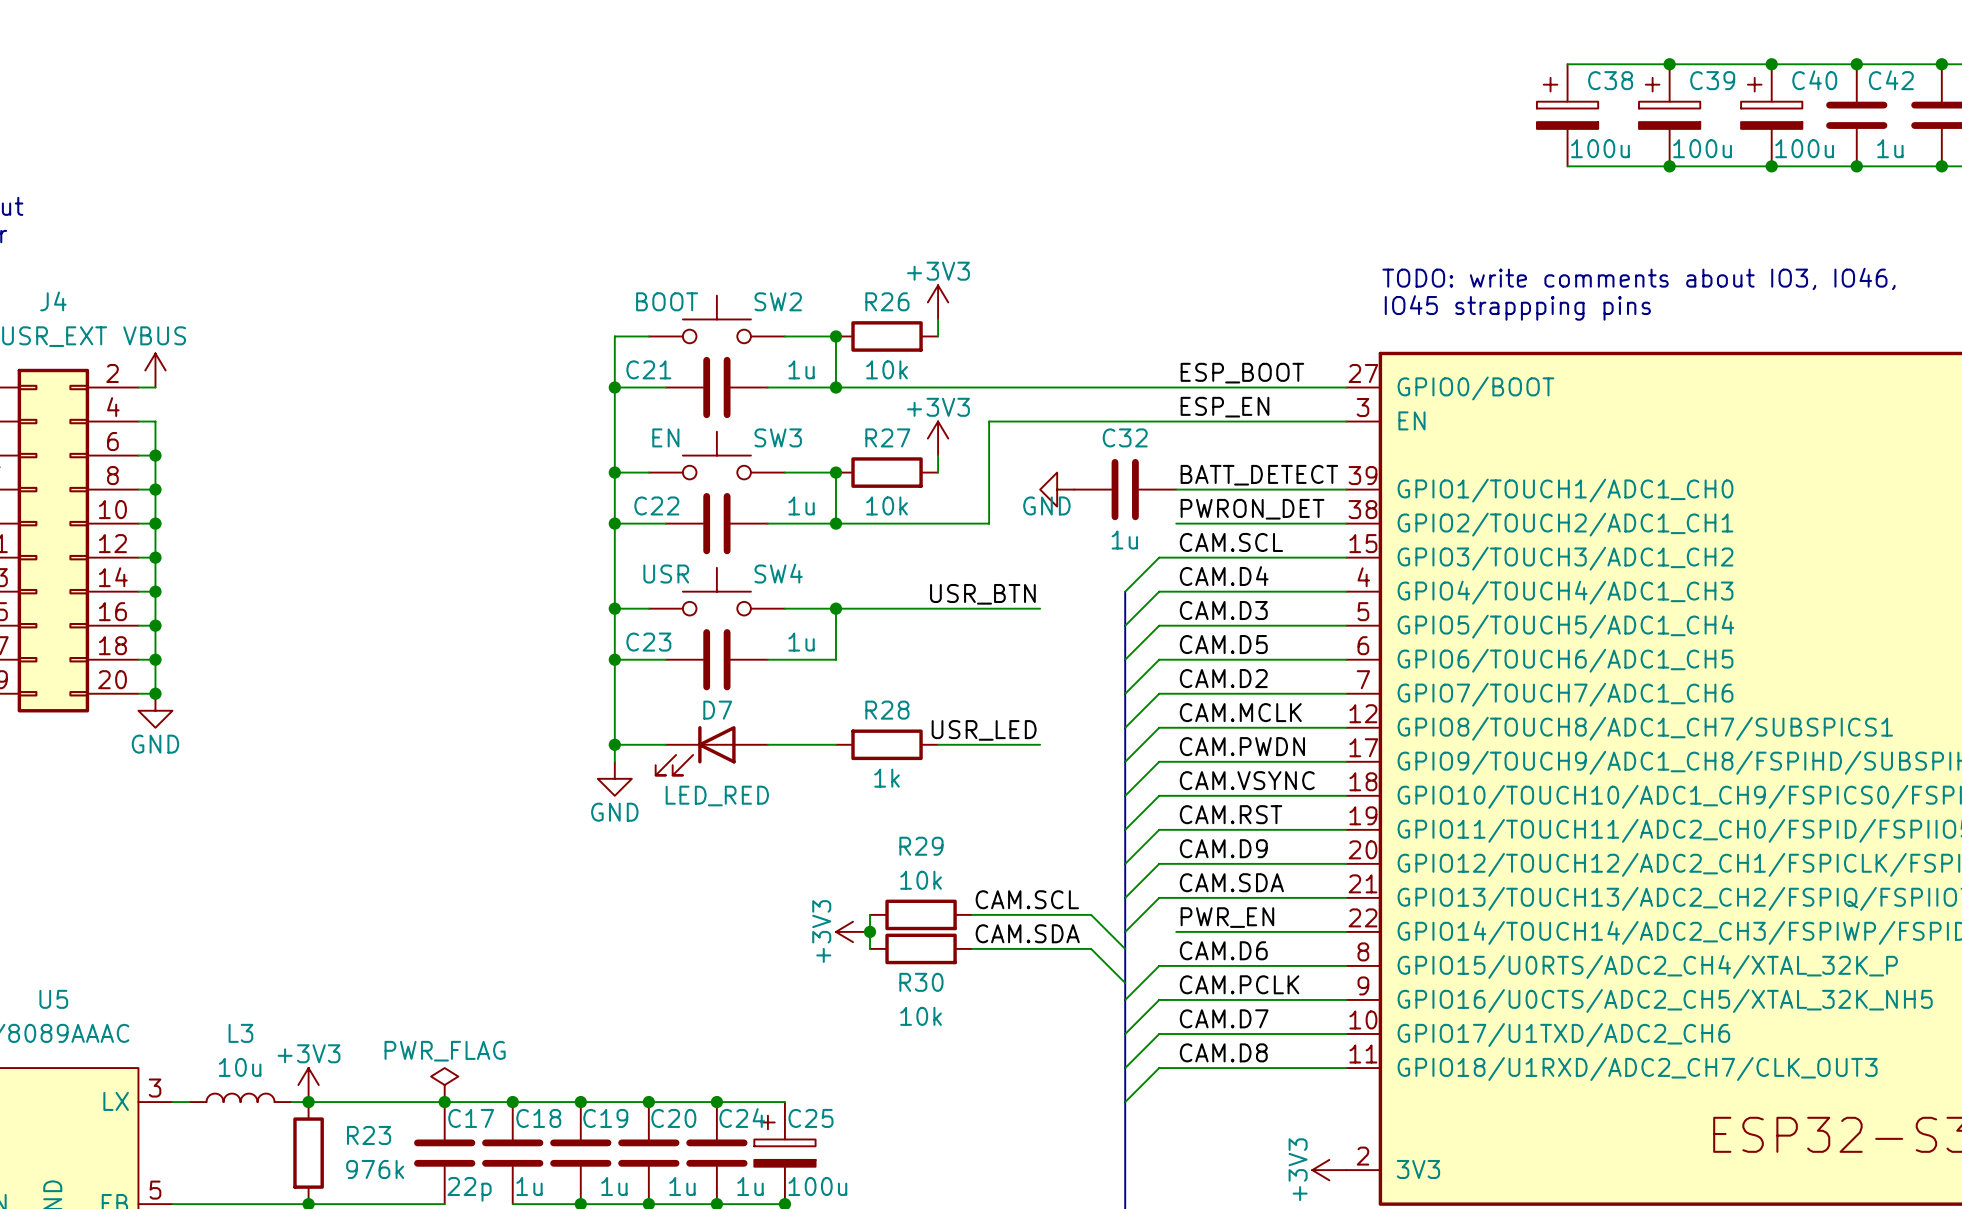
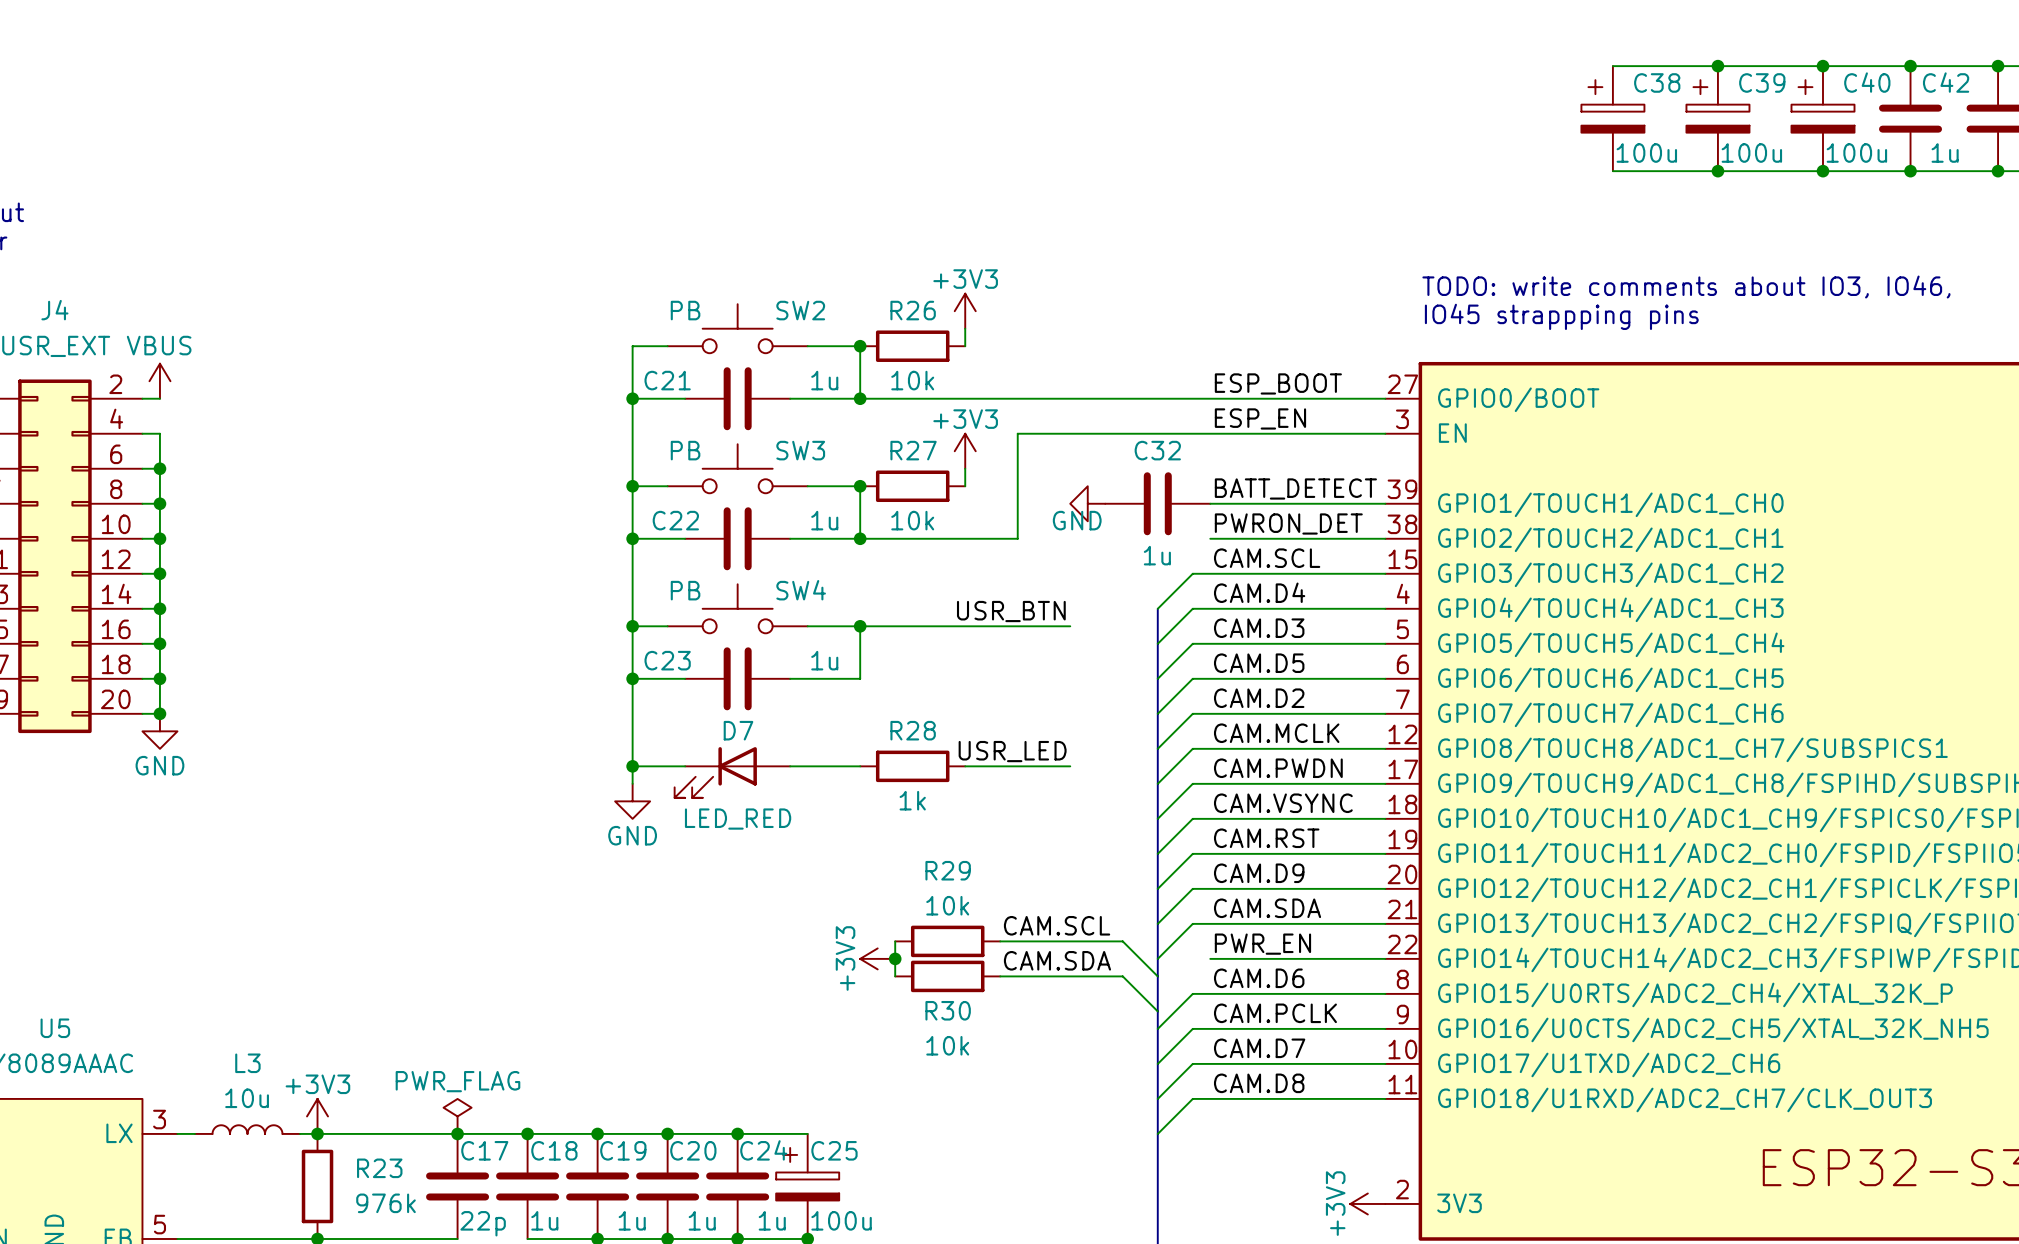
SW2 text: BOOT (667, 301) -> PB (685, 310)
SW3 text: EN (665, 437) -> PB (685, 450)
SW4 text: USR (666, 574) -> PB (685, 590)

